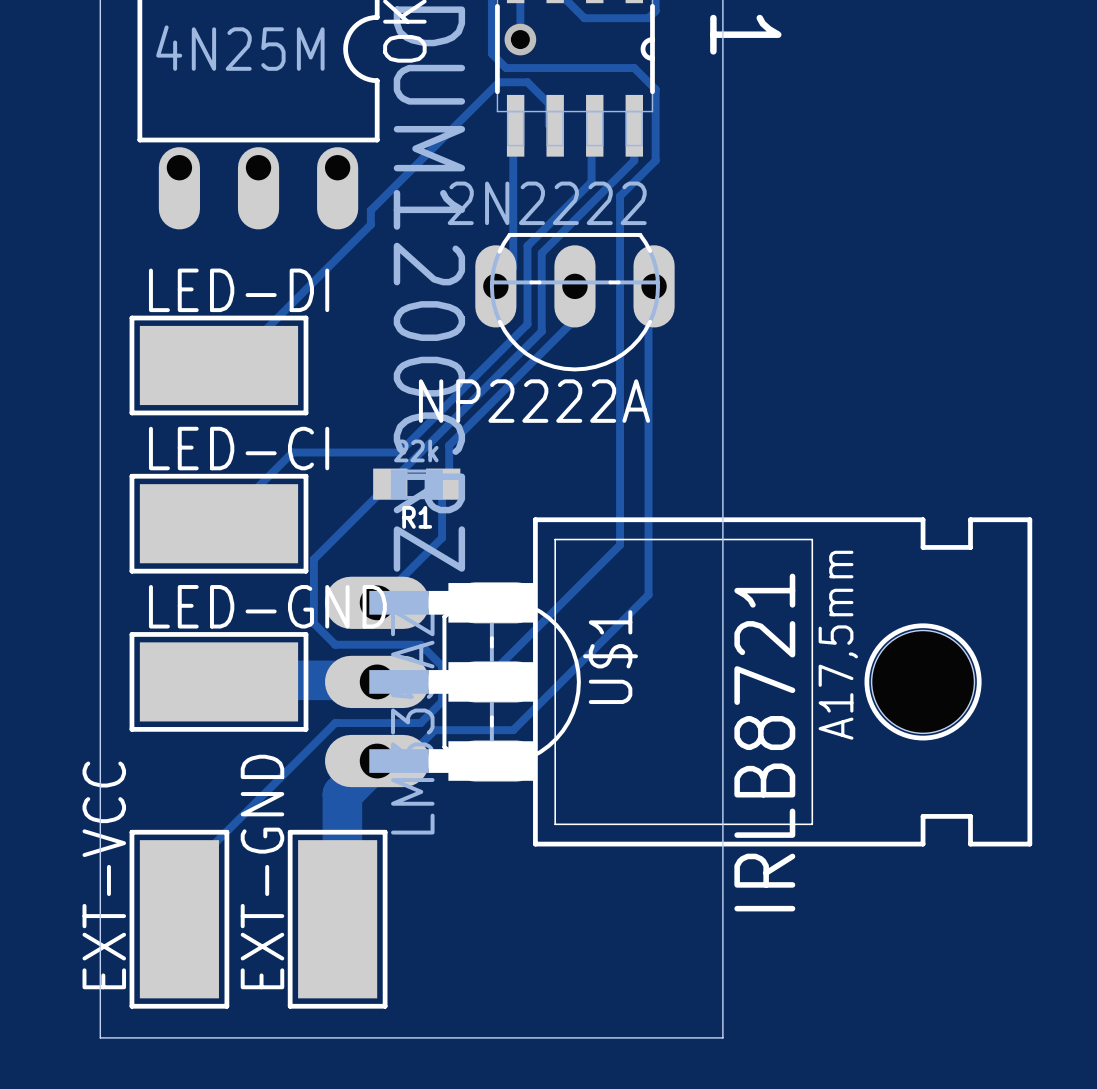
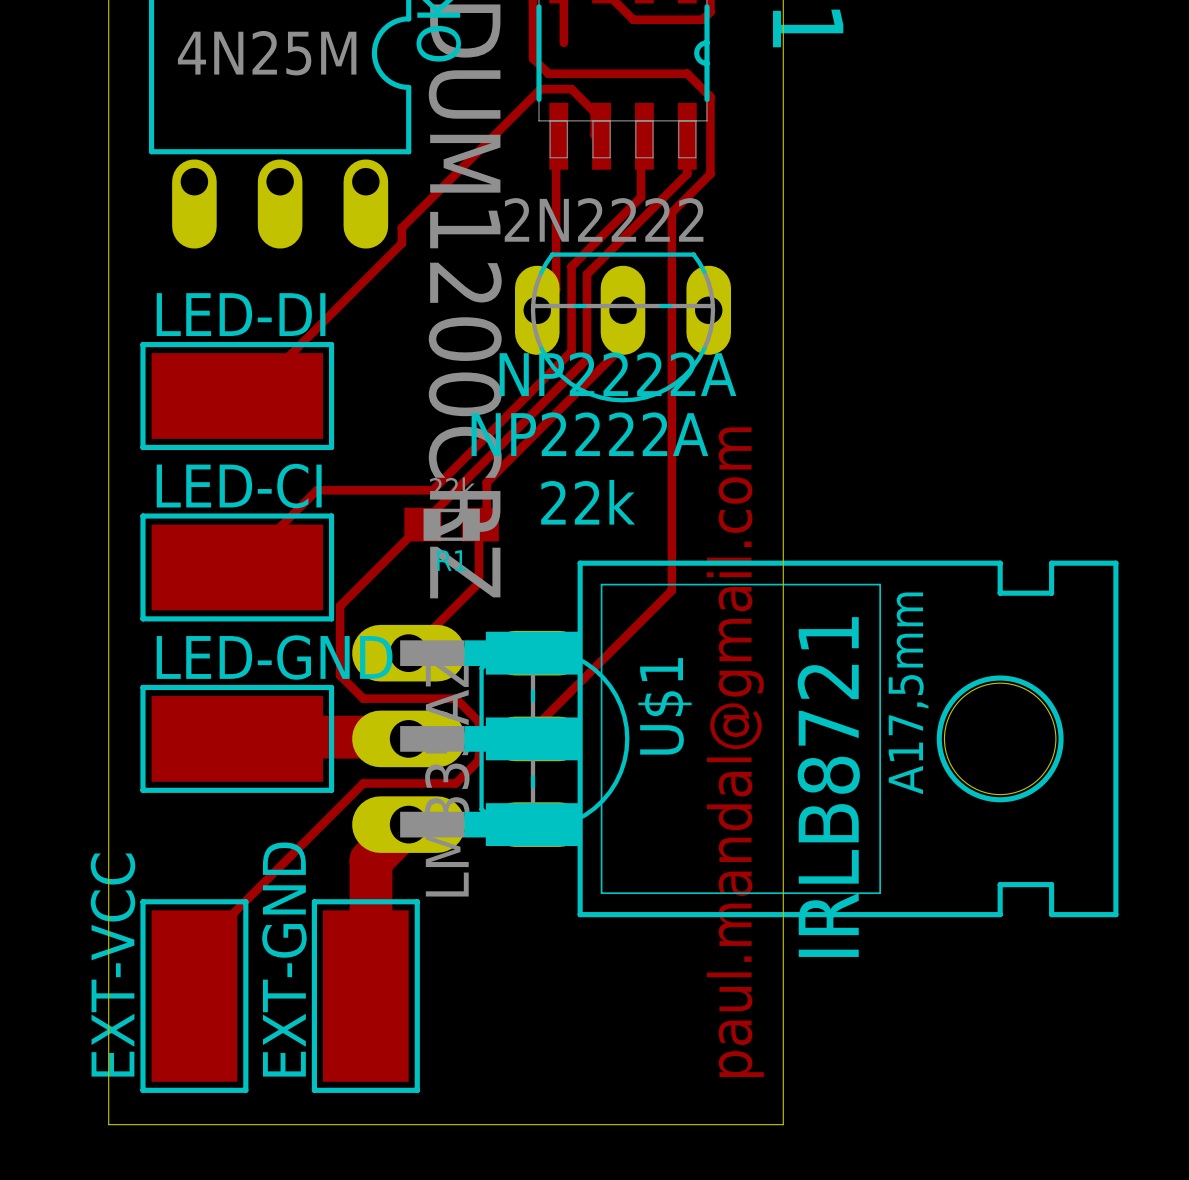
via: (520, 39) -> none
track: (654, 286) (648, 288) (648, 594) (513, 730) (434, 730) (406, 758) (377, 758) (377, 761) -> none
text: none -> NP2222A (617, 374)
text: none -> 22k (588, 502)
text: none -> paul.mandal@gmail.com (735, 752)

